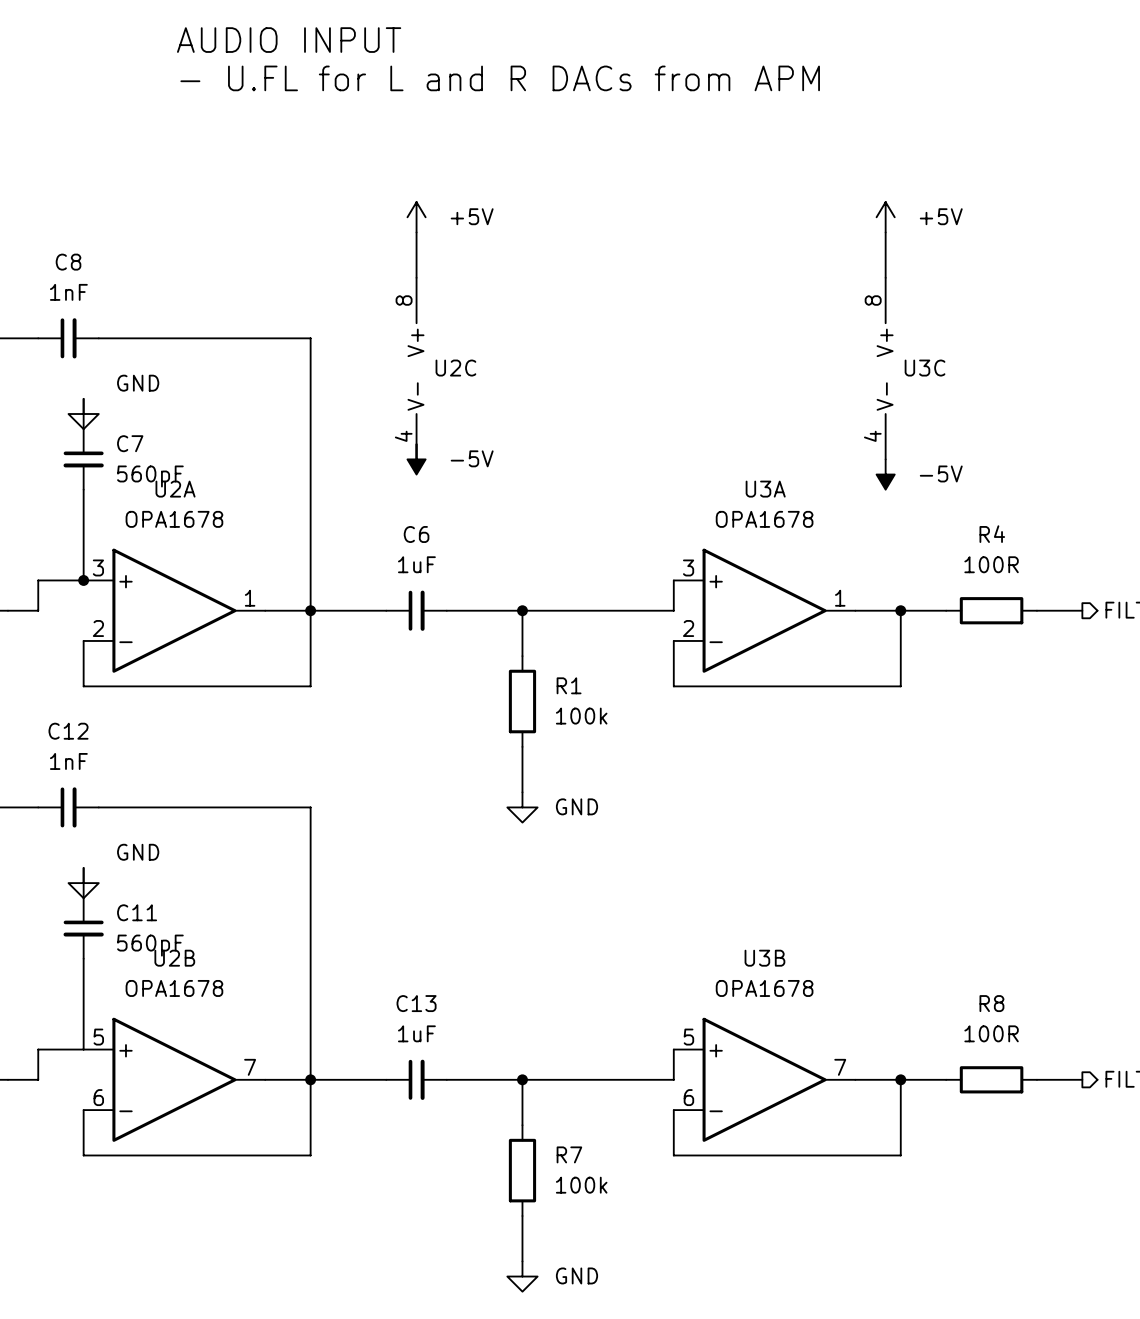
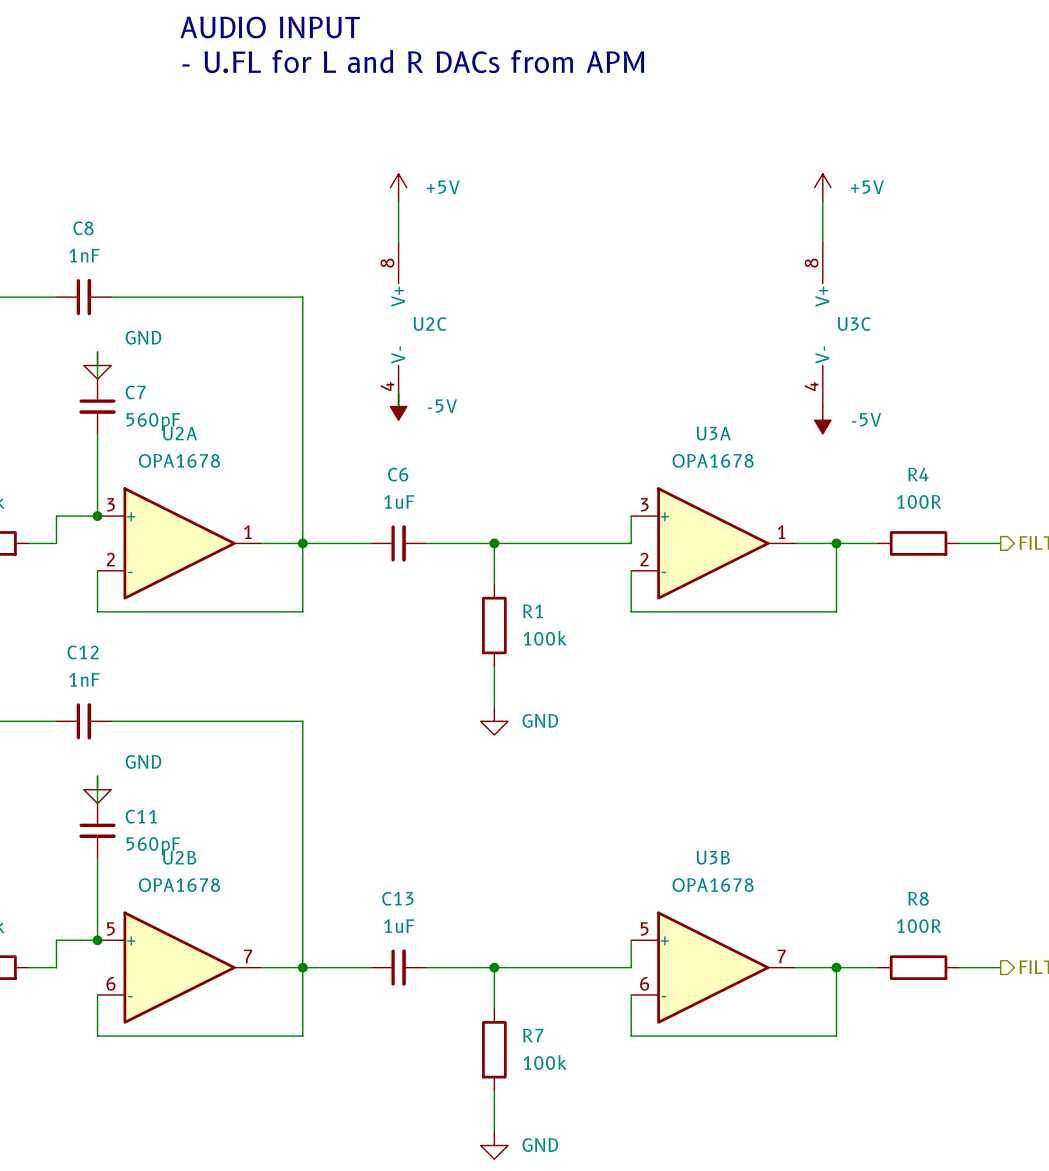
junction: none -> (97, 940)

